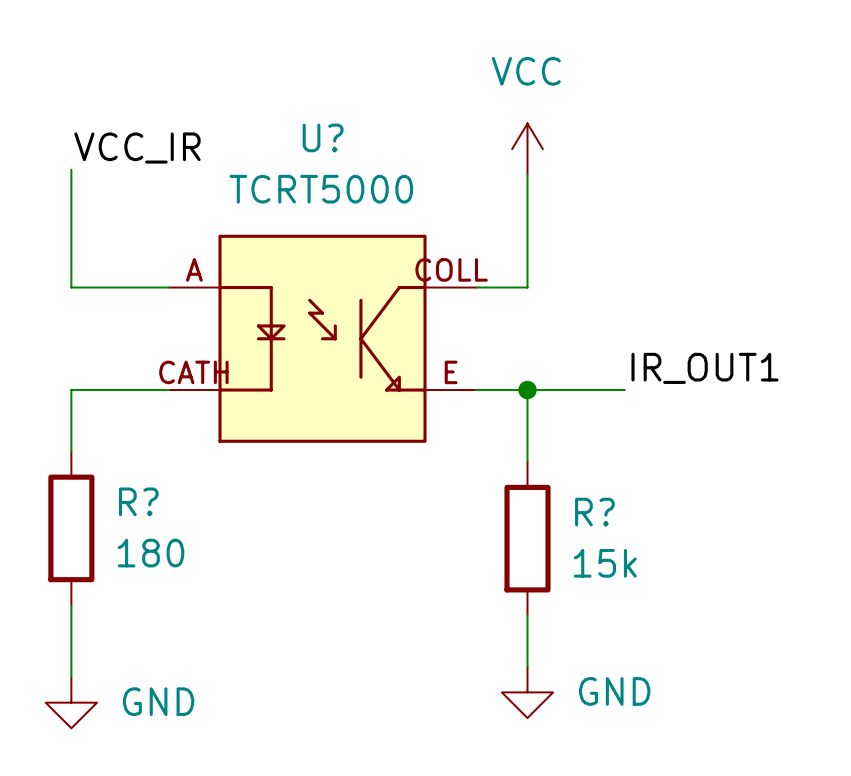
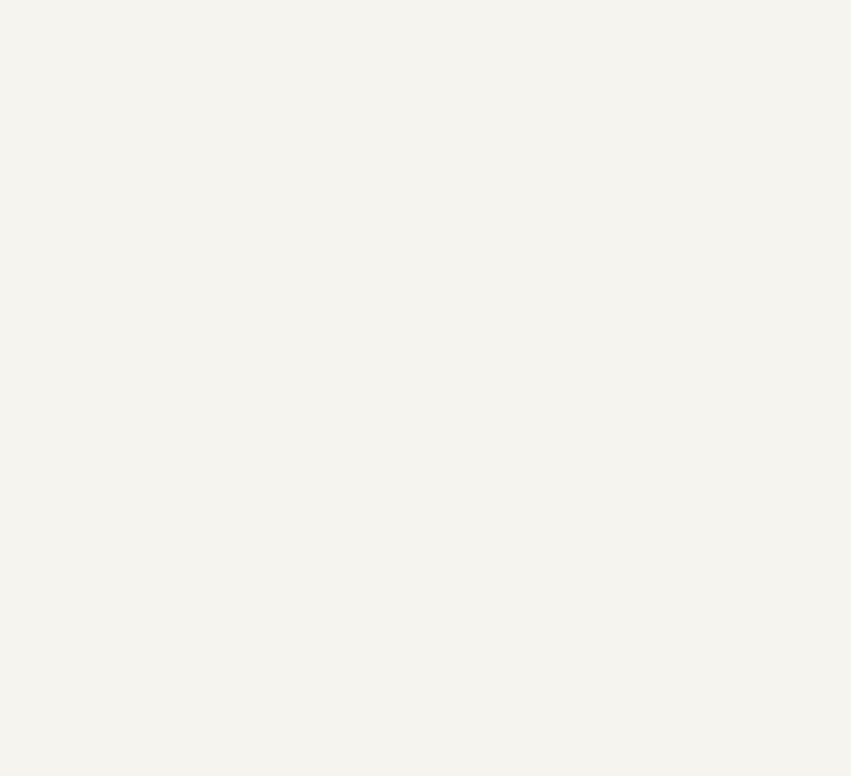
label: VCC_IR (137, 148) -> none
power symbol: VCC (527, 149) -> none
wire: (71, 169) (71, 287) (168, 287) -> none
wire: (527, 174) (527, 287) (476, 287) -> none
U?: TCRT5000 (322, 338) -> none
label: IR_OUT1 (705, 368) -> none
wire: (168, 390) (71, 390) (71, 451) -> none
wire: (476, 390) (624, 390) -> none
wire: (527, 390) (527, 461) -> none
junction: (527, 390) -> none
R?: 180 (71, 528) -> none
R?: 15k (527, 538) -> none
wire: (71, 605) (71, 677) -> none
wire: (527, 615) (527, 666) -> none
power symbol: GND (527, 692) -> none
power symbol: GND (71, 702) -> none

